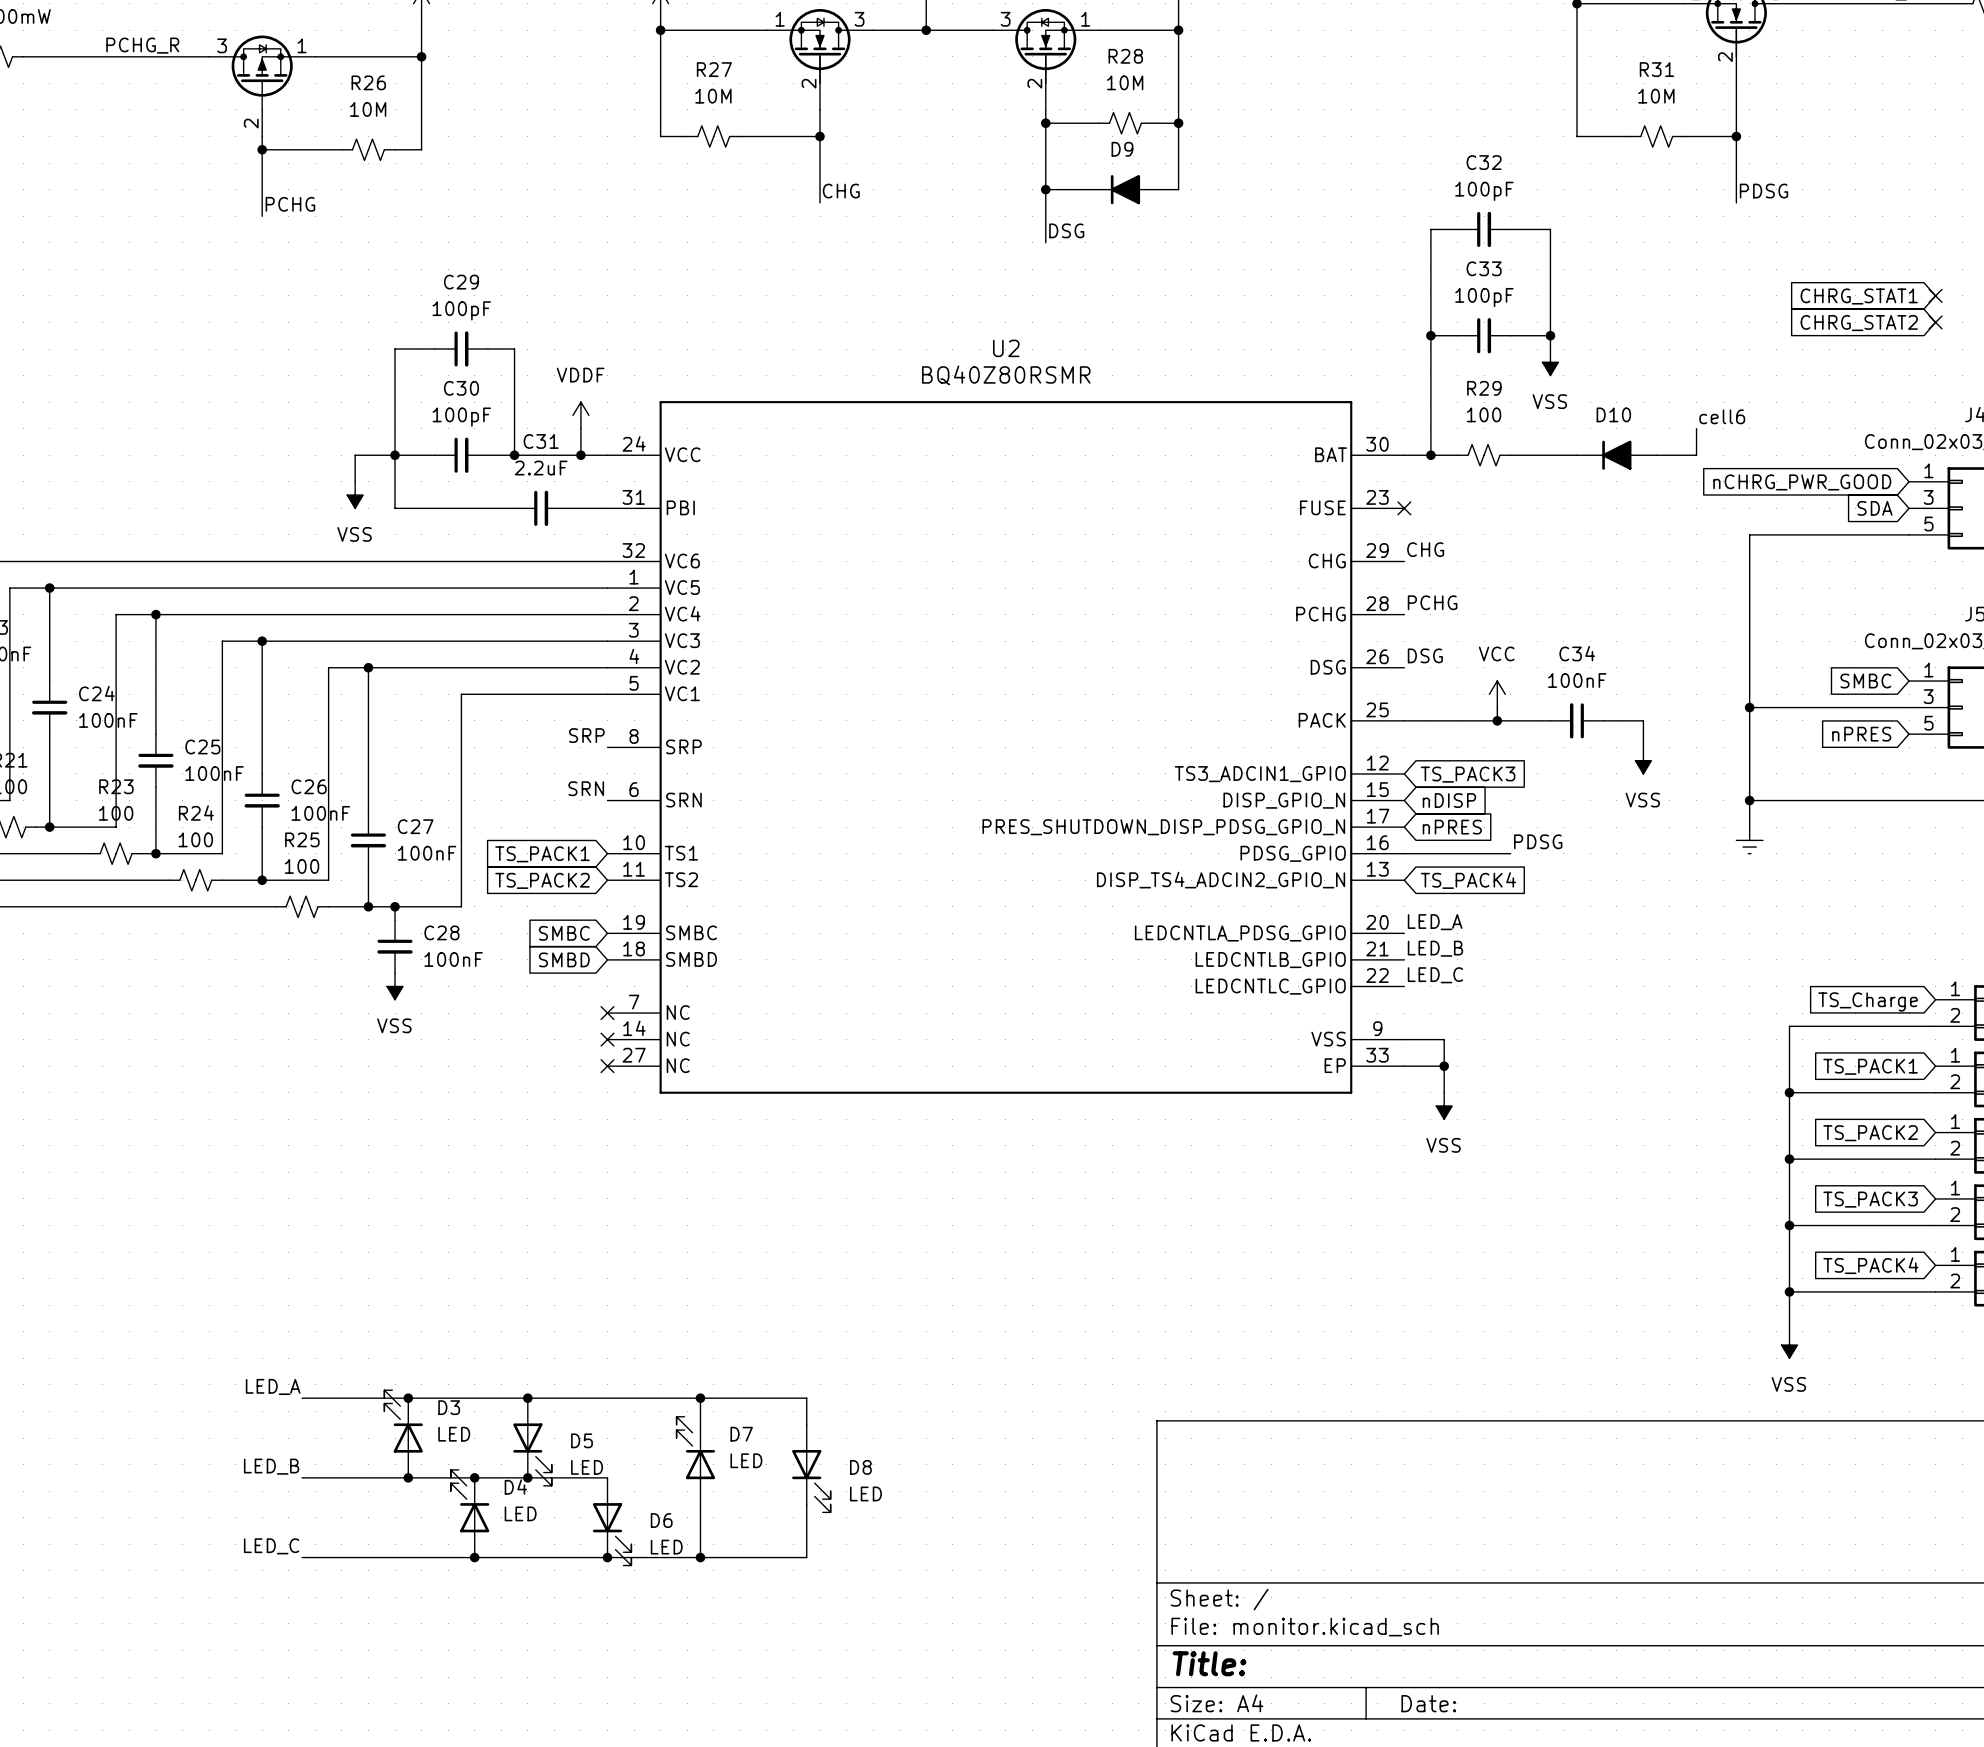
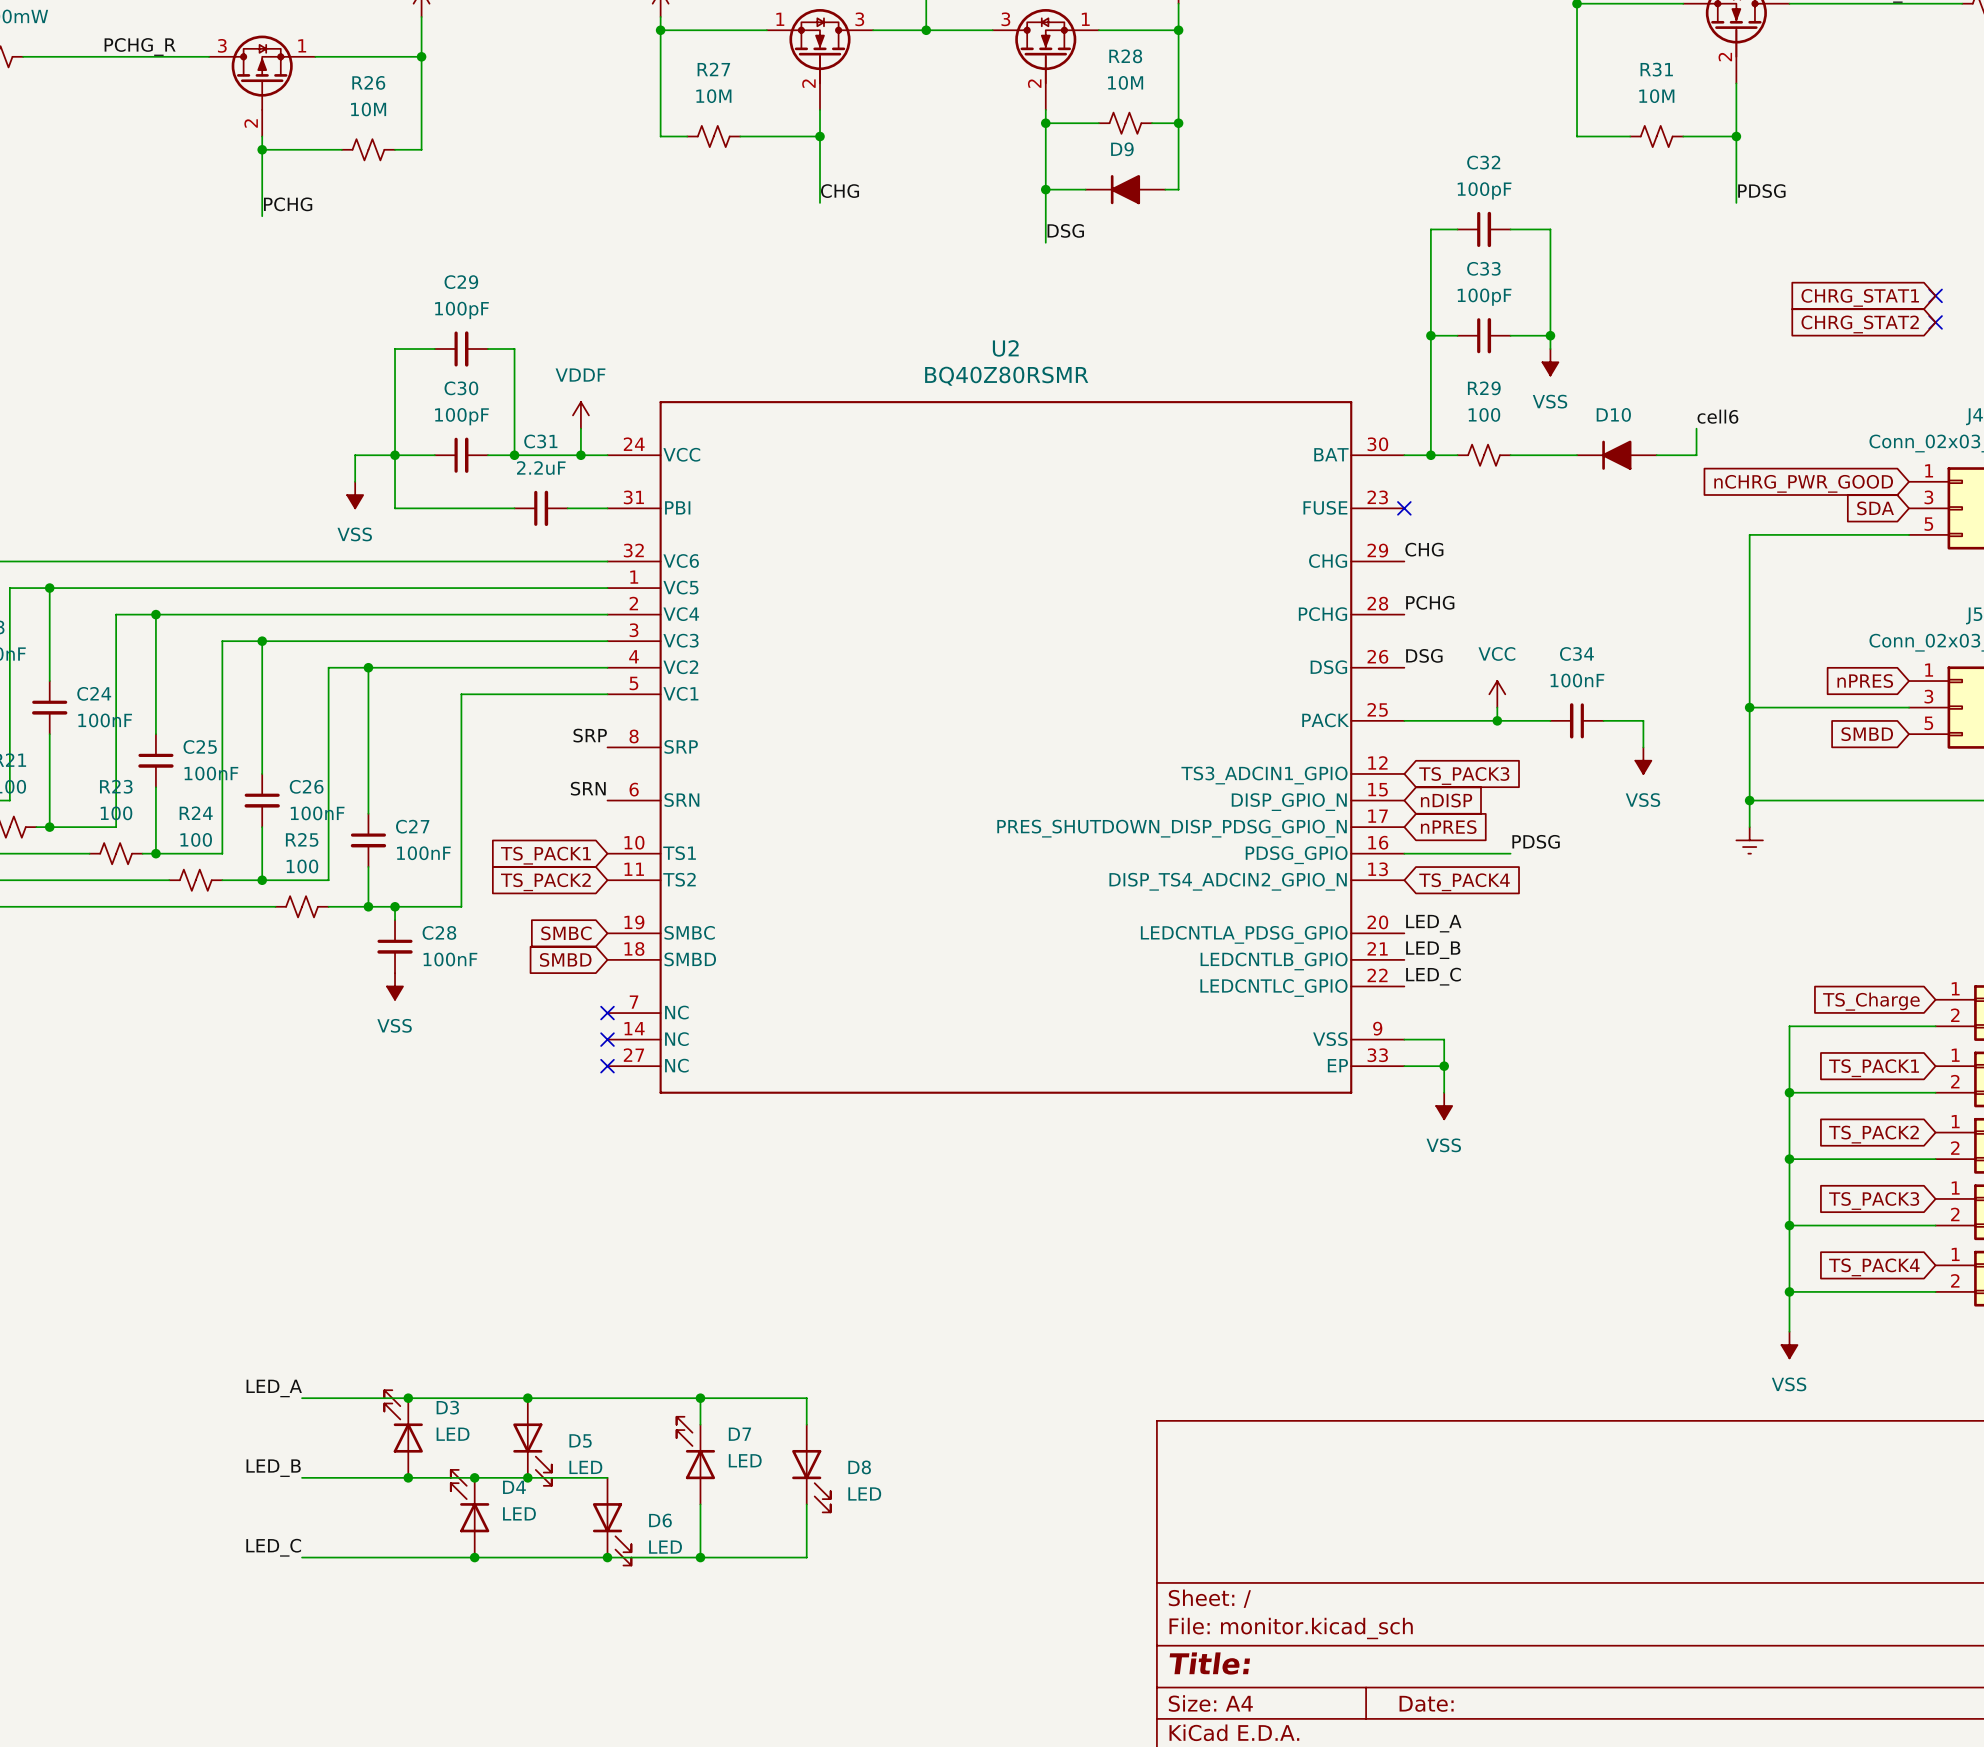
global label: SMBC (1865, 681) -> nPRES (1865, 681)
global label: nPRES (1861, 734) -> SMBD (1867, 734)

